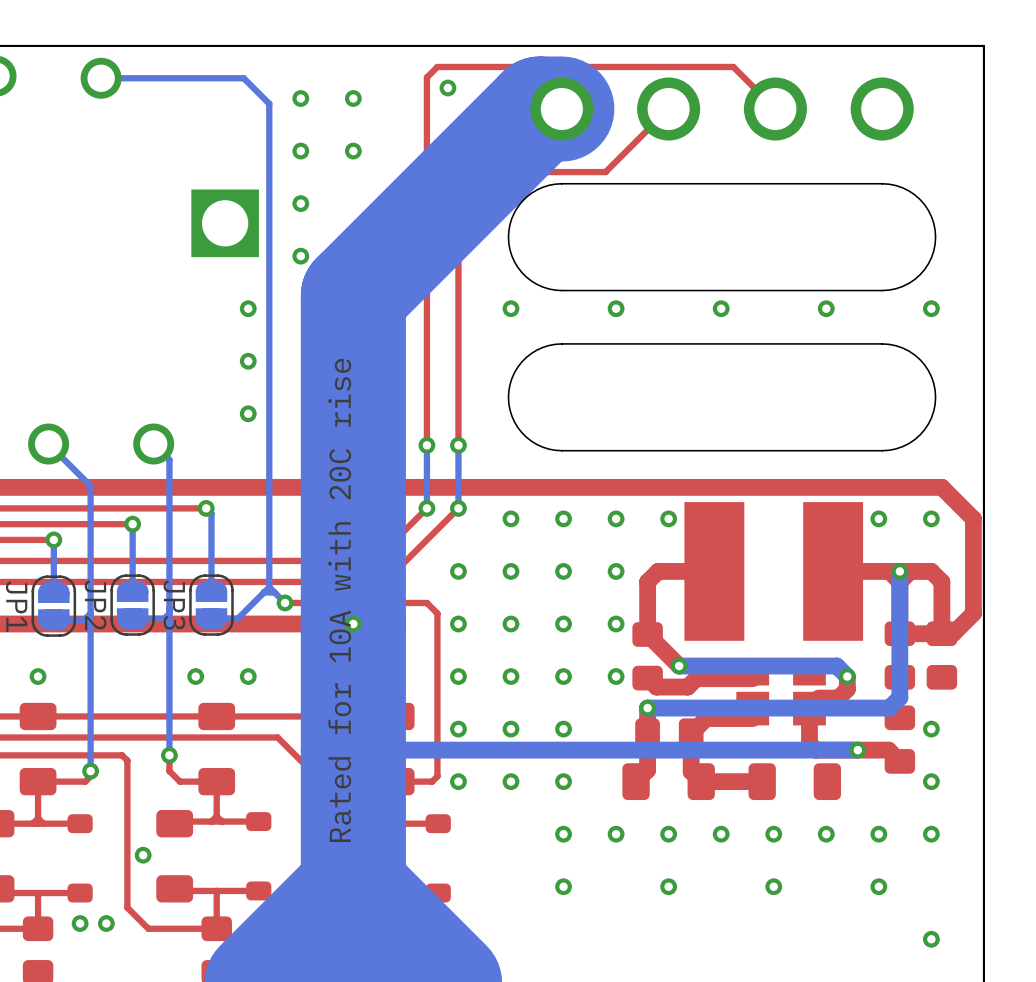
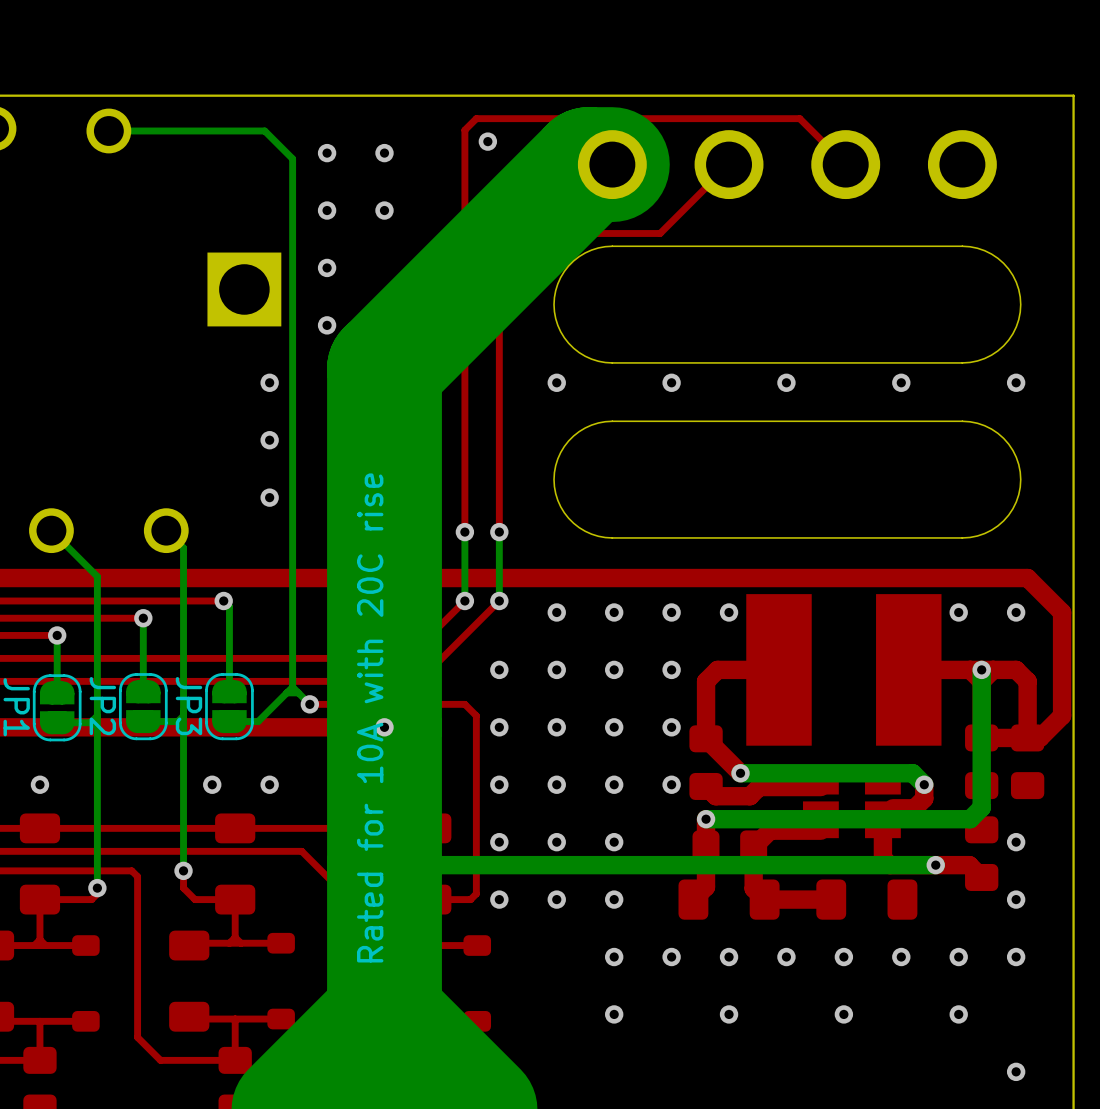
via: (143, 855) -> none
via: (80, 923) -> none
via: (106, 923) -> none

